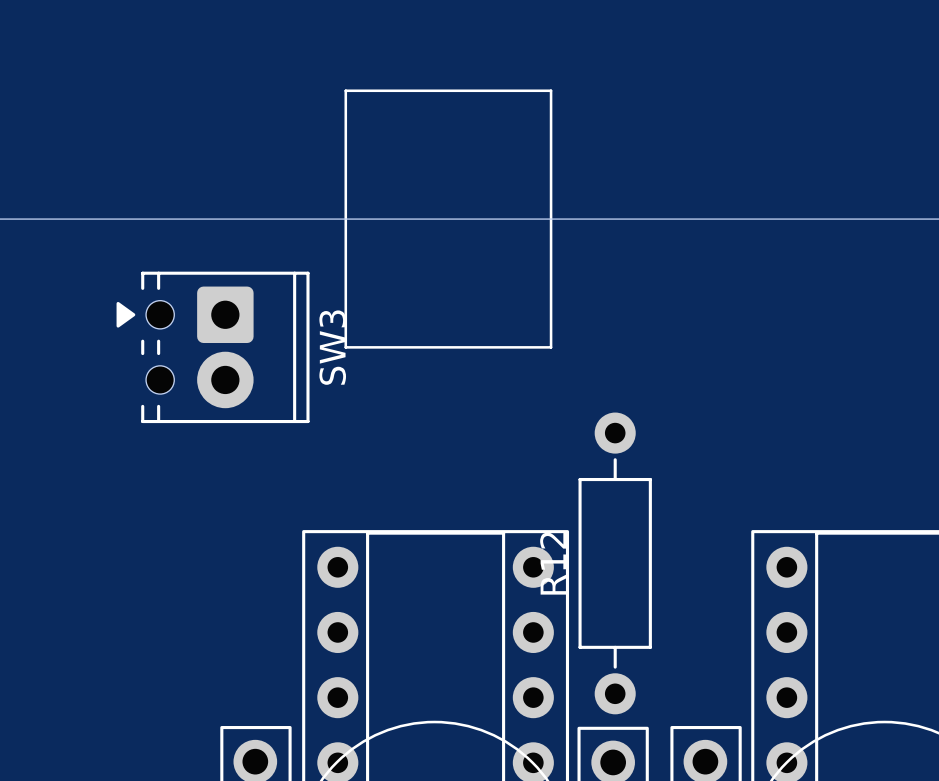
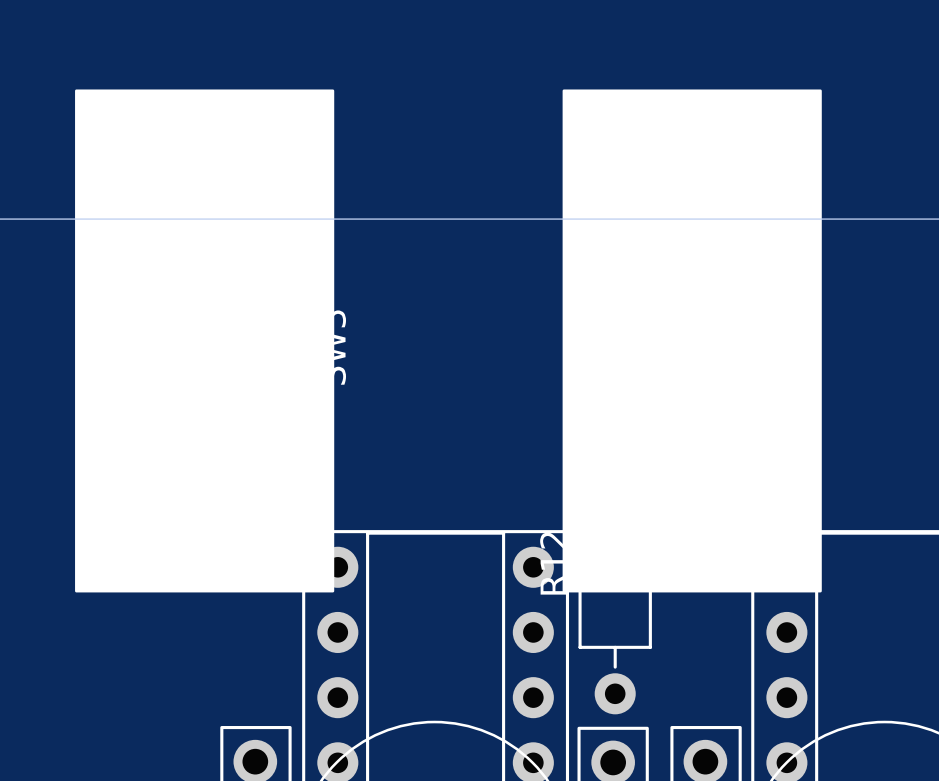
drawing: none -> [75, 89, 335, 593]
drawing: none -> [562, 89, 822, 593]
line: (345, 90) (345, 347) (551, 347) (551, 90) (345, 90) -> none

